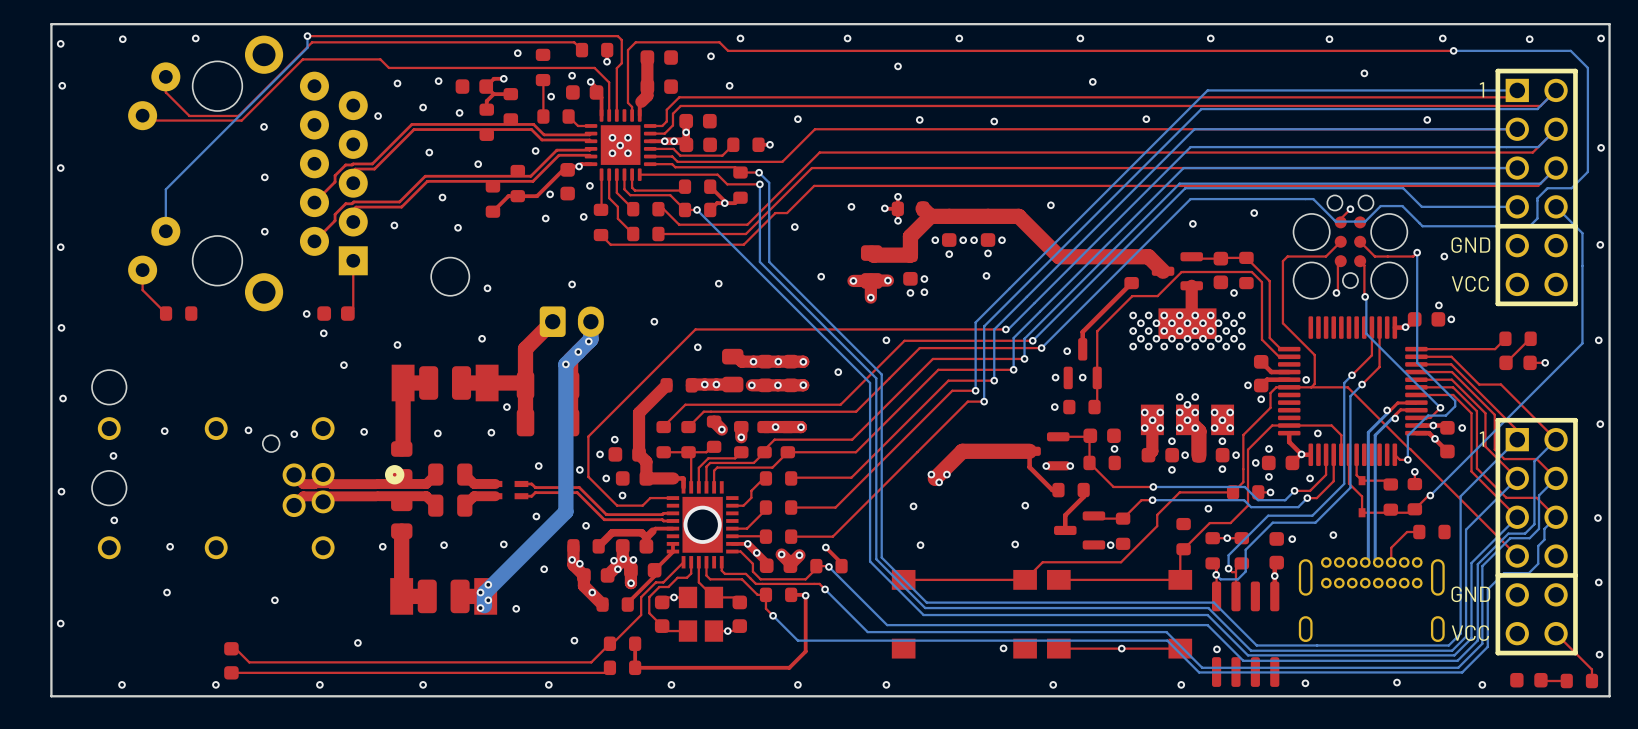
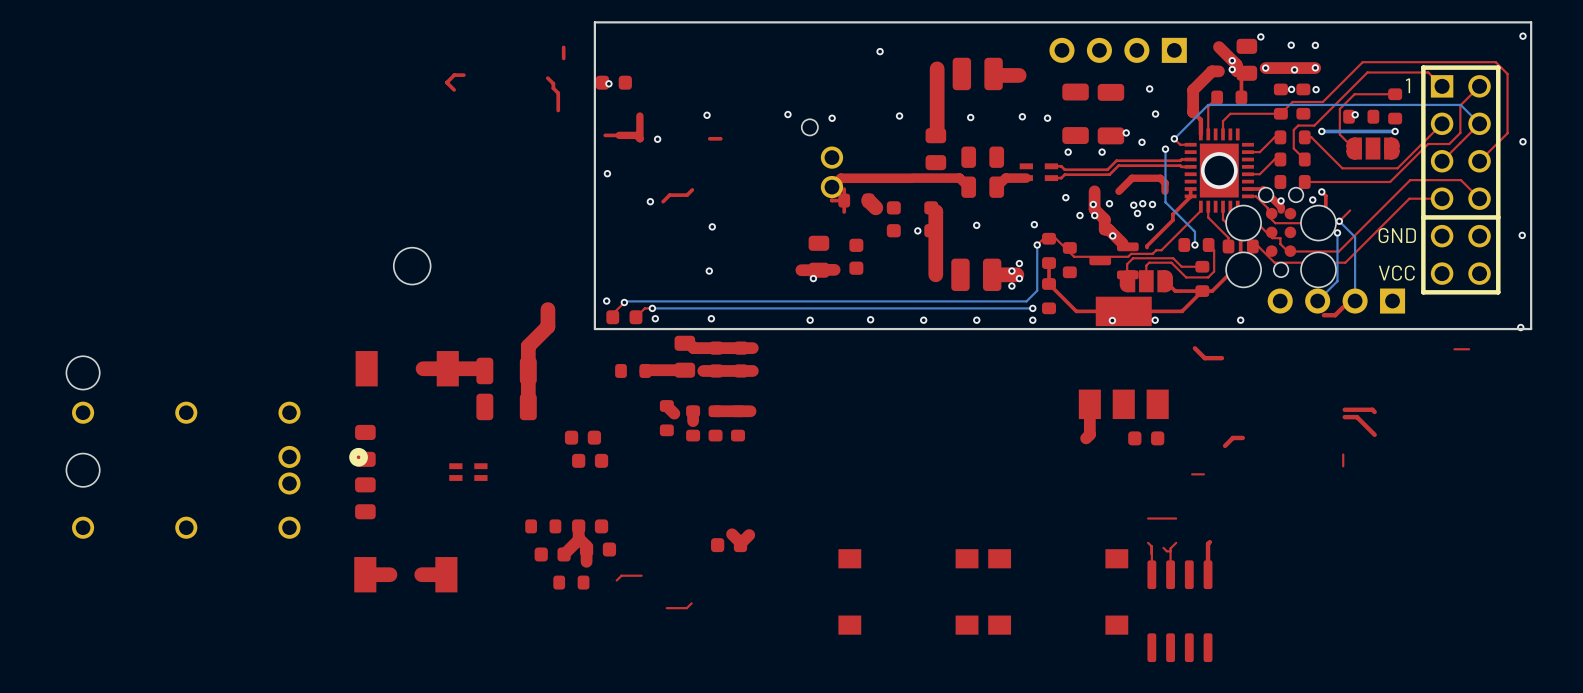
board edge: (639, 24) (51, 24) (51, 696) (1609, 696) (1609, 341) -> (594, 22) (594, 329) (1531, 329)
top track: (306, 36) (617, 36) (621, 40) (621, 63) (616, 68) (616, 115) -> none
bottom track: (307, 36) (307, 47) (165, 189) (165, 225) -> none
via: (307, 36) -> none
via: (195, 38) -> none
via: (740, 38) -> none
via: (847, 38) -> none
via: (959, 38) -> none
via: (1080, 38) -> none
via: (1210, 38) -> none
via: (1442, 38) -> none
via: (122, 39) -> none
via: (1529, 39) -> none
via: (60, 43) -> none
via: none -> (1291, 45)
via: none -> (1315, 45)
top track: none -> (1218, 47) (1236, 64) (1236, 71) (1246, 73) (1241, 78) (1241, 97)
top track: (582, 50) (574, 42) (312, 42) (238, 115) (189, 115) (165, 92) (165, 71) -> none
part: (594, 50) -> none
top track: (1453, 50) (728, 50) (719, 42) (635, 42) (627, 50) (627, 102) (632, 106) (632, 115) -> none
bottom track: (1453, 50) (1570, 50) (1587, 67) (1587, 171) (1571, 188) (1547, 188) (1537, 198) (1537, 218) (1529, 226) (1422, 226) (1402, 206) (1380, 206) (1365, 221) (1335, 221) (1313, 199) (1190, 199) (1041, 348) -> none
via: (1453, 50) -> none
via: (517, 53) -> none
part: none -> (1118, 50)
via: none -> (880, 51)
via: (711, 56) -> none
top track: (647, 57) (647, 95) (639, 103) (639, 115) -> none
part: (659, 57) -> none
via: (607, 61) -> none
part: none -> (1246, 59)
via: none -> (1232, 60)
via: (898, 66) -> none
part: (543, 67) -> none
via: none -> (1265, 68)
top track: none -> (1315, 68) (1265, 68)
via: none -> (1315, 67)
top track: none -> (937, 68) (935, 132)
via: none -> (1232, 69)
top track: none -> (1218, 71) (1211, 71) (1193, 90) (1193, 112) (1200, 119) (1200, 134)
via: (572, 75) -> none
part: none -> (977, 73)
via: (503, 78) -> none
top track: none -> (1019, 75) (994, 75)
top track: (543, 80) (543, 116) -> none
via: (438, 81) -> none
via: (590, 81) -> none
via: (1092, 81) -> none
via: (397, 83) -> none
via: (62, 85) -> none
via: (729, 85) -> none
part: (474, 86) -> none
via: none -> (608, 83)
top track: (1517, 90) (1510, 97) (679, 97) (666, 109) (666, 121) (662, 125) (650, 125) -> (1442, 86) (1428, 72) (1367, 72) (1314, 125) (1298, 125) (1293, 129) (1293, 148) (1304, 159)
bottom track: (1517, 90) (1207, 90) (975, 322) (975, 390) -> none
bottom track: (1556, 90) (1537, 109) (1201, 109) (984, 326) (984, 401) -> none
part: (584, 92) -> none
via: none -> (1149, 88)
via: none -> (1291, 89)
via: none -> (1316, 89)
top track: (510, 94) (493, 94) (486, 101) (486, 109) -> none
via: (551, 96) -> none
top track: none -> (1395, 94) (1354, 94) (1339, 108) (1339, 134) (1353, 148)
top track: none -> (1217, 97) (1208, 106) (1208, 134)
part: none -> (1229, 97)
top track: (1540, 105) (680, 105) (672, 113) (672, 125) (664, 133) (650, 133) -> (1464, 101) (1460, 105) (1460, 132) (1449, 144) (1428, 144) (1390, 181) (1304, 181)
part: (510, 106) -> none
part: none -> (1280, 101)
part: none -> (1303, 101)
via: (423, 107) -> none
part: none -> (1395, 106)
via: (459, 112) -> none
top track: (609, 115) (609, 82) (594, 67) (388, 67) (380, 59) (302, 59) (241, 120) (147, 120) (142, 115) -> none
via: (378, 116) -> none
part: (556, 116) -> none
top track: (568, 116) (578, 125) (591, 125) -> none
part: none -> (1075, 113)
via: (797, 119) -> none
via: none -> (787, 114)
via: (919, 119) -> none
via: (1146, 119) -> none
part: none -> (1110, 114)
via: none -> (1155, 114)
via: none -> (707, 115)
part: (698, 121) -> none
via: none -> (899, 116)
via: (994, 121) -> none
via: none -> (1022, 116)
part: none -> (1361, 116)
part: (486, 122) -> none
via: none -> (970, 117)
via: none -> (832, 118)
via: none -> (1047, 118)
via: (264, 126) -> none
top track: (1517, 129) (814, 129) (782, 161) (677, 161) (672, 156) (650, 156) -> (1442, 123) (1397, 168) (1342, 168) (1311, 137) (1304, 137)
bottom track: (1517, 129) (1194, 129) (994, 329) (994, 380) -> none
bottom track: (1556, 129) (1538, 147) (1190, 147) (1008, 329) (1005, 329) -> (1479, 123) (1460, 104) (1208, 104) (1174, 138)
via: (686, 132) -> none
top track: (591, 133) (544, 134) (533, 124) (411, 124) (372, 163) (345, 164) (335, 175) (335, 181) (314, 202) -> none
via: (612, 137) -> none
via: (627, 137) -> none
via: none -> (1321, 131)
bottom track: none -> (1395, 131) (1321, 131)
via: none -> (1395, 131)
via: none -> (1126, 132)
top track: (591, 141) (541, 139) (531, 129) (414, 129) (374, 169) (355, 169) (353, 171) (353, 183) -> none
via: (664, 141) -> none
via: (674, 141) -> none
top track: none -> (1280, 137) (1274, 137) (1259, 152) (1247, 152)
part: none -> (1292, 137)
part: (698, 144) -> none
top track: (733, 144) (722, 155) (680, 155) (673, 148) (650, 148) -> none
part: (745, 144) -> none
via: (769, 144) -> none
top track: none -> (1174, 138) (1180, 144) (1190, 144)
via: none -> (1174, 138)
part: (620, 145) -> none
via: (620, 145) -> none
via: none -> (657, 139)
top track: (591, 148) (556, 150) (530, 176) (425, 176) (399, 201) (353, 201) (345, 203) (335, 214) (335, 220) (314, 241) -> none
via: none -> (1141, 142)
via: (535, 150) -> none
via: (429, 152) -> none
top track: (1532, 152) (819, 152) (747, 224) (679, 224) (663, 209) (658, 209) -> (1457, 146) (1442, 161)
via: (612, 153) -> none
via: (627, 153) -> none
part: none -> (1373, 148)
part: none -> (935, 149)
bottom track: none -> (1165, 149) (1165, 202) (1194, 231) (1194, 245)
via: none -> (1165, 149)
top track: (591, 156) (559, 155) (532, 181) (427, 181) (401, 207) (355, 207) (353, 209) (353, 221) -> none
via: none -> (1068, 152)
via: none -> (1102, 152)
part: none -> (982, 157)
via: (478, 164) -> none
top track: (591, 164) (581, 164) (579, 166) (571, 166) (567, 169) (563, 169) (536, 196) (508, 196) (492, 211) -> none
top track: (650, 164) (672, 164) (675, 167) (735, 167) (740, 172) (758, 172) -> none
part: none -> (822, 158)
via: (579, 166) -> none
top track: none -> (1190, 159) (1116, 160) (1107, 169) (1064, 169) (1061, 166) (1051, 166)
top track: none -> (1280, 159) (1274, 159) (1259, 174) (1247, 174)
part: none -> (1292, 159)
via: (60, 168) -> none
top track: (1517, 168) (811, 168) (745, 234) (658, 234) -> none
bottom track: (1517, 168) (1183, 168) (1013, 337) (1013, 369) -> none
top track: (1556, 168) (1538, 185) (814, 185) (787, 213) (775, 213) (743, 244) (610, 244) (601, 235) -> (1479, 161) (1507, 133) (1507, 73) (1495, 62) (1362, 62) (1322, 101) (1292, 101) (1280, 113) (1230, 113) (1222, 121) (1222, 134)
bottom track: (1556, 168) (1540, 183) (1179, 183) (1024, 338) (1024, 358) -> none
bottom track: (759, 172) (769, 182) (769, 261) (881, 374) (881, 557) (926, 602) (1213, 602) (1256, 645) (1316, 645) -> none
via: (759, 172) -> none
part: (247, 173) -> none
top track: none -> (1190, 166) (1118, 165) (1109, 174) (1064, 174) (1061, 178) (1051, 178)
top track: (601, 174) (601, 209) -> none
top track: (609, 174) (609, 198) (617, 206) (617, 218) (633, 234) -> none
top track: (616, 174) (616, 192) (633, 209) -> none
top track: (624, 174) (624, 189) (630, 195) (670, 195) (685, 209) (697, 209) -> none
top track: (632, 174) (632, 187) (634, 190) (681, 190) (685, 186) -> none
top track: (639, 174) (717, 174) (727, 184) (759, 184) -> none
via: (264, 177) -> none
part: none -> (1219, 170)
via: none -> (1219, 170)
part: none -> (1038, 172)
via: none -> (607, 173)
part: (567, 181) -> none
part: (517, 183) -> none
bottom track: (759, 184) (759, 261) (876, 378) (876, 559) (925, 608) (1208, 608) (1251, 650) (1452, 650) (1466, 636) (1466, 529) (1517, 478) -> none
via: (759, 184) -> none
via: (589, 185) -> none
part: (740, 185) -> none
top track: none -> (911, 178) (840, 178) (831, 187)
top track: none -> (913, 178) (959, 178) (968, 187)
top track: none -> (1026, 178) (1005, 178) (996, 187)
part: (697, 186) -> none
top track: (710, 186) (726, 203) -> none
part: none -> (1292, 181)
via: (550, 194) -> none
part: none -> (982, 187)
via: (898, 196) -> none
top track: none -> (1190, 188) (1190, 196) (1172, 214) (1172, 220) (1147, 247)
top track: none -> (1247, 188) (1262, 188) (1281, 207) (1281, 210)
via: (442, 197) -> none
part: (492, 199) -> none
top track: none -> (1094, 191) (1094, 209) (1104, 219) (1104, 229) (1108, 229) (1122, 243)
top track: none -> (1165, 191) (1165, 182) (1160, 178) (1132, 178) (1118, 191)
top track: none -> (1321, 191) (1325, 195) (1325, 210)
via: none -> (1321, 191)
via: (724, 203) -> none
top track: none -> (1247, 196) (1255, 196) (1267, 208) (1267, 215) (1275, 223) (1337, 223) (1350, 210)
via: (1050, 205) -> none
via: none -> (1065, 197)
via: (851, 206) -> none
top track: none -> (1442, 198) (1409, 198) (1345, 262) (1274, 262) (1258, 246) (1252, 246)
bottom track: (1517, 206) (1421, 206) (1403, 188) (1185, 188) (1032, 340) -> none
top track: none -> (1479, 198) (1460, 180) (1410, 180) (1338, 251) (1287, 251) (1280, 244) (1280, 238) (1272, 238) (1257, 223) (1226, 223) (1222, 219) (1222, 206)
bottom track: (1556, 206) (1582, 233) (1582, 343) (1430, 495) -> none
via: (884, 208) -> none
via: none -> (1312, 199)
part: (645, 209) -> none
bottom track: (697, 209) (870, 383) (870, 561) (923, 615) (1207, 615) (1248, 655) (1454, 655) (1471, 638) (1471, 563) (1517, 517) -> none
part: (697, 209) -> none
top track: (1350, 209) (1340, 218) (1340, 222) -> none
via: none -> (1093, 204)
via: none -> (1109, 203)
via: none -> (1142, 203)
via: none -> (1152, 204)
via: none -> (1133, 205)
via: (1254, 213) -> none
top track: none -> (1200, 206) (1200, 210) (1161, 250) (1156, 250) (1152, 253) (1131, 253) (1128, 256) (1074, 256) (1056, 238) (1043, 238) (1037, 245)
top track: none -> (1208, 206) (1208, 217) (1228, 237) (1228, 246)
via: (583, 216) -> none
via: (545, 218) -> none
via: (898, 220) -> none
top track: none -> (935, 211) (935, 274)
part: (601, 222) -> none
via: none -> (1137, 213)
via: (1192, 223) -> none
via: none -> (1079, 215)
via: none -> (1094, 215)
via: (394, 225) -> none
via: (458, 227) -> none
via: (794, 227) -> none
bottom track: none -> (1339, 221) (1355, 237) (1355, 301)
via: none -> (1339, 221)
via: (264, 231) -> none
via: none -> (1034, 224)
part: (645, 234) -> none
via: none -> (976, 225)
via: none -> (712, 226)
via: none -> (1150, 226)
via: (935, 240) -> none
via: (963, 240) -> none
via: (1002, 240) -> none
top track: (1340, 241) (1325, 256) (1287, 256) (1282, 261) (1282, 323) (1314, 355) (1314, 383) (1311, 387) -> none
top track: (1360, 241) (1374, 256) (1413, 256) (1417, 252) -> none
bottom track: none -> (1337, 232) (1337, 281) (1317, 301)
via: none -> (1337, 232)
via: none -> (1112, 235)
via: (60, 247) -> none
top track: none -> (1240, 237) (1240, 262) (1212, 291) (1175, 291) (1165, 281)
bottom track: (1417, 252) (1417, 362) (1455, 400) (1455, 406) (1445, 415) (1428, 415) (1407, 435) (1407, 459) -> none
via: (1417, 252) -> none
top track: (871, 253) (873, 255) (910, 255) (910, 236) (930, 216) (1018, 216) (1059, 256) (1148, 256) (1163, 271) -> none
via: (988, 253) -> none
via: (949, 254) -> none
bottom track: none -> (1037, 245) (1037, 290) (1026, 301) (624, 302)
via: none -> (1037, 245)
via: none -> (1194, 245)
part: none -> (1196, 245)
top track: none -> (1208, 245) (1214, 250) (1214, 271) (1208, 277) (1186, 277) (1171, 262) (1149, 262) (1146, 265) (1146, 281)
top track: (1191, 256) (1193, 258) (1246, 257) (1269, 281) (1269, 337) (1280, 349) (1289, 349) -> none
part: none -> (1240, 246)
via: (1444, 256) -> none
top track: (353, 260) (353, 308) (347, 313) -> none
part: none -> (1049, 250)
top track: (1340, 261) (1337, 263) (1336, 292) -> none
top track: (1360, 261) (1364, 265) (1365, 296) -> none
top track: (142, 270) (142, 290) (166, 313) -> none
part: (1220, 270) -> none
part: (1246, 270) -> none
top track: none -> (1049, 262) (1049, 283) (1076, 311) (1182, 311) (1202, 291)
via: none -> (1019, 263)
via: (986, 275) -> none
via: (821, 276) -> none
top track: none -> (1202, 266) (1181, 266) (1173, 258) (1133, 258) (1127, 264) (1127, 281)
top track: (870, 279) (870, 297) -> none
via: (924, 279) -> none
via: (853, 280) -> none
via: (887, 280) -> none
via: none -> (709, 271)
via: none -> (1011, 271)
via: (718, 283) -> none
top track: (1131, 283) (1082, 331) (1082, 349) -> none
via: (572, 284) -> none
part: none -> (976, 274)
top track: none -> (1016, 274) (992, 274)
top track: (1191, 285) (1191, 311) (1195, 315) -> none
via: (487, 288) -> none
via: none -> (813, 278)
via: none -> (1019, 278)
part: none -> (1202, 278)
via: (910, 292) -> none
via: (924, 292) -> none
part: none -> (1146, 281)
via: (1234, 292) -> none
via: (1336, 292) -> none
bottom track: (1365, 296) (1366, 333) (1440, 407) -> none
via: (1365, 296) -> none
via: (870, 297) -> none
via: none -> (1011, 286)
via: (1438, 305) -> none
part: none -> (1049, 296)
via: none -> (606, 301)
part: none -> (1336, 301)
part: (178, 313) -> none
via: (306, 313) -> none
part: (336, 313) -> none
top track: none -> (624, 302) (612, 314) (612, 317)
via: none -> (624, 302)
via: (1133, 315) -> none
via: (1148, 315) -> none
via: (1164, 315) -> none
via: (1179, 315) -> none
via: (1195, 315) -> none
via: (1210, 315) -> none
via: (1226, 315) -> none
via: (1241, 315) -> none
part: (1426, 319) -> none
via: (1451, 319) -> none
top track: none -> (652, 308) (644, 308) (635, 317)
via: none -> (652, 308)
bottom track: none -> (1032, 308) (652, 308)
via: none -> (1032, 308)
top track: (552, 321) (525, 348) (525, 422) -> none
part: (571, 321) -> none
bottom track: (590, 321) (590, 339) (565, 364) (565, 511) (484, 593) (484, 605) -> none
via: (654, 321) -> none
via: (1140, 323) -> none
via: (1156, 323) -> none
via: (1171, 323) -> none
via: (1187, 323) -> none
via: (1202, 323) -> none
via: (1218, 323) -> none
via: (1234, 323) -> none
via: (61, 327) -> none
top track: (1371, 327) (1371, 355) (1351, 375) -> none
top track: (1379, 327) (1379, 367) (1362, 384) -> none
via: (1405, 327) -> none
part: none -> (624, 317)
top track: (1005, 329) (695, 329) (588, 436) (588, 476) (617, 505) (642, 505) (650, 498) (672, 498) -> none
via: (1005, 329) -> none
via: none -> (655, 318)
via: none -> (711, 318)
via: (1133, 331) -> none
via: (1148, 331) -> none
via: (1164, 331) -> none
via: (1179, 331) -> none
via: (1195, 331) -> none
via: (1210, 331) -> none
via: (1226, 331) -> none
via: (1241, 331) -> none
via: none -> (810, 320)
via: none -> (870, 319)
via: none -> (923, 320)
via: none -> (976, 320)
via: none -> (1032, 320)
via: none -> (1155, 320)
via: none -> (1240, 320)
via: (323, 333) -> none
via: none -> (1112, 320)
via: (482, 338) -> none
via: (1140, 338) -> none
via: (1156, 338) -> none
via: (1171, 338) -> none
via: (1187, 338) -> none
via: (1202, 338) -> none
via: (1218, 338) -> none
via: (1234, 338) -> none
top track: (1505, 338) (1495, 349) (1416, 349) -> none
part: (1518, 338) -> none
top track: (1530, 338) (1506, 362) -> none
via: (886, 340) -> none
top track: (1032, 340) (904, 340) (840, 404) (685, 404) (663, 427) -> none
via: (1032, 340) -> none
via: (588, 341) -> none
via: (397, 344) -> none
via: (1133, 346) -> none
via: (1148, 346) -> none
via: (1164, 346) -> none
via: (1179, 346) -> none
via: (1195, 346) -> none
via: (1210, 346) -> none
via: (1226, 346) -> none
via: (1241, 346) -> none
via: (697, 347) -> none
top track: (1041, 348) (919, 348) (856, 411) (703, 411) (688, 427) -> none
via: (1041, 348) -> none
via: (578, 351) -> none
via: (1067, 351) -> none
top track: (1289, 356) (1279, 356) (1261, 339) (1261, 282) (1251, 272) (1181, 272) (1157, 296) (1132, 296) (1097, 331) (1097, 404) (1094, 407) -> none
top track: (1416, 356) (1451, 356) (1479, 384) (1500, 384) (1556, 439) -> none
top track: (1024, 358) (932, 358) (852, 439) (774, 439) (753, 462) (710, 462) (706, 466) (706, 487) -> none
via: (1024, 358) -> none
via: (753, 361) -> none
via: (778, 361) -> none
via: (803, 361) -> none
part: (1518, 362) -> none
via: (1545, 362) -> none
part: (1082, 363) -> none
via: (565, 364) -> none
top track: (1416, 364) (1451, 364) (1517, 430) (1517, 439) -> none
via: (343, 365) -> none
top track: (1013, 369) (938, 369) (855, 452) (787, 452) (772, 467) (717, 467) (714, 470) (714, 487) -> none
via: (1013, 369) -> none
via: (838, 372) -> none
top track: (1416, 372) (1452, 372) (1494, 414) (1494, 449) (1504, 459) (1536, 459) (1556, 478) -> none
part: (1261, 373) -> none
bottom track: (1351, 375) (1344, 383) (1344, 483) (1312, 515) (1268, 515) (1228, 555) (1228, 568) -> none
via: (1351, 375) -> none
via: (1055, 377) -> none
via: (1082, 377) -> none
top track: (1289, 379) (1267, 379) (1261, 385) -> none
via: (1306, 379) -> none
top track: (1416, 379) (1451, 379) (1485, 413) (1485, 446) (1517, 478) -> none
top track: (994, 380) (948, 380) (851, 477) (791, 478) -> none
via: (994, 380) -> none
top track: (428, 383) (403, 383) (401, 448) -> none
part: (445, 383) -> none
via: (704, 384) -> none
via: (716, 384) -> none
bottom track: (1362, 384) (1350, 396) (1350, 487) (1315, 522) (1272, 522) (1245, 549) (1245, 571) (1237, 579) (1220, 579) (1216, 574) -> none
via: (1362, 384) -> none
top track: (666, 385) (639, 412) (639, 454) (646, 461) (646, 478) (683, 478) (683, 487) -> none
via: (751, 385) -> none
via: (777, 385) -> none
via: (803, 385) -> none
via: (1248, 385) -> none
top track: (1416, 387) (1453, 387) (1476, 411) (1476, 468) (1506, 497) (1536, 497) (1556, 517) -> none
top track: (975, 390) (952, 390) (835, 507) (791, 507) -> none
via: (975, 390) -> none
part: (1352, 391) -> none
top track: (1416, 394) (1453, 394) (1471, 413) (1471, 471) (1517, 517) -> none
via: (1179, 396) -> none
via: (1195, 396) -> none
via: (63, 398) -> none
via: (1261, 399) -> none
top track: (984, 401) (967, 401) (832, 536) (791, 536) -> none
via: (984, 401) -> none
top track: (1416, 402) (1397, 402) (1390, 410) (1387, 410) -> none
via: (1187, 404) -> none
via: (506, 407) -> none
via: (1054, 407) -> none
part: (1081, 407) -> none
top track: (1440, 407) (1430, 417) (1416, 417) -> none
via: (1440, 407) -> none
bottom track: (1387, 410) (1387, 413) (1368, 432) (1368, 559) (1365, 562) -> none
via: (1387, 410) -> none
top track: (1416, 410) (1400, 409) (1395, 415) (1395, 418) -> none
via: (1144, 412) -> none
via: (1160, 412) -> none
via: (1179, 412) -> none
via: (1195, 412) -> none
via: (1214, 412) -> none
via: (1230, 412) -> none
bottom track: (1395, 418) (1391, 418) (1375, 435) (1375, 559) (1378, 562) -> none
via: (1395, 418) -> none
top track: (1187, 419) (1198, 431) (1198, 455) -> none
via: (1152, 420) -> none
via: (1187, 420) -> none
via: (1222, 420) -> none
via: (1600, 424) -> none
via: (1433, 425) -> none
via: (775, 427) -> none
via: (801, 427) -> none
via: (1144, 428) -> none
via: (1160, 428) -> none
via: (1179, 428) -> none
via: (1195, 428) -> none
via: (1214, 428) -> none
via: (1230, 428) -> none
via: (1462, 428) -> none
via: (721, 429) -> none
via: (248, 430) -> none
via: (164, 431) -> none
via: (364, 431) -> none
via: (491, 432) -> none
via: (437, 433) -> none
top track: (1289, 433) (1289, 442) (1301, 454) -> none
via: (1317, 433) -> none
via: (294, 434) -> none
top track: (1090, 435) (1058, 436) -> none
part: (1102, 435) -> none
top track: (1089, 436) (1089, 462) (1113, 486) (1153, 486) -> none
via: (741, 437) -> none
via: (1435, 438) -> none
via: (614, 439) -> none
part: (663, 439) -> none
part: (688, 439) -> none
part: (1447, 439) -> none
bottom track: (1517, 439) (1460, 496) (1460, 633) (1448, 645) (1317, 645) -> none
bottom track: (1556, 439) (1534, 461) (1534, 524) (1525, 533) (1508, 533) (1477, 564) (1477, 640) (1457, 660) (1243, 660) (1207, 625) (887, 625) (828, 566) -> none
via: (1171, 441) -> none
via: (1222, 441) -> none
top track: (714, 444) (706, 452) (663, 452) -> none
via: (1114, 448) -> none
via: (1268, 448) -> none
part: (1043, 451) -> none
top track: (741, 452) (735, 458) (708, 458) (698, 467) (698, 487) -> none
top track: (691, 453) (691, 487) -> none
via: (600, 454) -> none
via: (1301, 454) -> none
top track: (1326, 454) (1326, 474) (1310, 490) (1294, 490) -> none
top track: (1333, 454) (1333, 481) (1316, 498) (1307, 498) -> none
top track: (1341, 454) (1341, 435) (1331, 425) (1272, 425) (1248, 449) (1248, 505) (1230, 523) (1209, 523) (1180, 552) (1180, 579) (1058, 579) -> none
top track: (1348, 454) (1348, 483) (1362, 496) (1362, 512) (1411, 512) (1430, 495) -> none
top track: (1356, 454) (1356, 475) (1362, 480) (1386, 480) (1390, 484) -> none
top track: (1394, 454) (1399, 459) (1407, 459) -> none
via: (113, 455) -> none
part: (1160, 455) -> none
via: (1185, 455) -> none
via: (1236, 455) -> none
via: (1407, 459) -> none
part: (1102, 462) -> none
via: (1255, 462) -> none
part: (1280, 462) -> none
via: (538, 466) -> none
via: (1046, 466) -> none
via: (1070, 466) -> none
via: (579, 469) -> none
via: (1171, 469) -> none
via: (1222, 469) -> none
via: (1414, 471) -> none
top track: (294, 474) (303, 484) (376, 484) -> none
top track: (435, 474) (426, 483) (378, 483) -> none
part: (450, 474) -> none
top track: (464, 474) (474, 483) (495, 483) -> none
via: (931, 474) -> none
via: (946, 474) -> none
part: (284, 476) -> none
via: (1268, 476) -> none
via: (606, 478) -> none
top track: (765, 478) (751, 490) (751, 497) (743, 505) (732, 505) -> none
part: (778, 478) -> none
top track: (935, 478) (962, 451) (1029, 451) (1029, 467) (1052, 490) (1058, 490) -> none
via: (1310, 478) -> none
bottom track: (1556, 478) (1539, 495) (1539, 528) (1529, 538) (1510, 538) (1482, 566) (1482, 643) (1458, 667) (1202, 667) (1166, 632) (867, 632) (825, 589) -> none
via: (939, 482) -> none
top track: (521, 483) (531, 483) (535, 487) (579, 487) (606, 514) (672, 513) -> none
bottom track: (1153, 486) (1244, 486) (1258, 500) (1285, 500) (1294, 490) -> none
via: (1153, 486) -> none
part: (1071, 490) -> none
top track: (1083, 490) (1083, 496) (1065, 515) (1065, 530) -> none
via: (1294, 490) -> none
via: (61, 491) -> none
part: (1245, 492) -> none
via: (1270, 492) -> none
via: (622, 495) -> none
via: (1430, 495) -> none
top track: (376, 496) (303, 496) (294, 505) -> none
top track: (378, 496) (426, 496) (435, 505) -> none
top track: (495, 496) (474, 496) (464, 505) -> none
top track: (521, 496) (531, 496) (535, 492) (577, 492) (604, 519) (672, 520) -> none
part: (1362, 496) -> none
part: (1414, 496) -> none
part: (1390, 497) -> none
bottom track: (1307, 498) (1298, 507) (1251, 507) (1244, 500) (1152, 500) -> none
via: (1307, 498) -> none
top track: (1152, 500) (1141, 500) (1123, 518) (1096, 518) (1093, 515) -> none
via: (1152, 500) -> none
part: (450, 505) -> none
via: (1025, 505) -> none
via: (913, 506) -> none
top track: (765, 507) (746, 528) (732, 528) -> none
part: (778, 507) -> none
via: (1208, 508) -> none
via: (536, 516) -> none
bottom track: (1556, 517) (1544, 528) (1544, 539) (1538, 545) (1538, 563) (1528, 573) (1504, 573) (1487, 589) (1487, 646) (1462, 672) (1199, 672) (1167, 640) (797, 640) (773, 615) -> none
via: (1597, 518) -> none
via: (114, 520) -> none
part: (702, 524) -> none
via: (702, 524) -> none
via: (586, 525) -> none
top track: (672, 528) (655, 528) (646, 537) -> none
part: (1079, 530) -> none
top track: (401, 531) (401, 596) -> none
part: (1123, 531) -> none
top track: (1419, 532) (1407, 532) (1391, 547) (1391, 562) -> none
part: (1431, 532) -> none
via: (1333, 535) -> none
top track: (732, 536) (765, 536) -> none
part: (778, 536) -> none
part: (1183, 536) -> none
part: (1536, 536) -> none
top track: (646, 537) (641, 532) (612, 532) (598, 546) -> none
via: (1227, 538) -> none
via: (1292, 539) -> none
top track: (672, 543) (672, 551) (654, 570) (654, 576) (627, 604) -> none
top track: (732, 543) (747, 543) (766, 562) (766, 565) -> none
via: (747, 543) -> none
via: (503, 544) -> none
via: (1015, 544) -> none
via: (444, 545) -> none
via: (920, 545) -> none
via: (1110, 545) -> none
via: (170, 546) -> none
via: (382, 546) -> none
top track: (573, 546) (573, 564) (583, 575) (583, 585) (602, 604) -> none
top track: (825, 547) (841, 563) (841, 566) -> none
via: (825, 547) -> none
part: (1212, 550) -> none
part: (1241, 550) -> none
part: (1276, 550) -> none
top track: (732, 551) (740, 551) (752, 563) (752, 571) (760, 579) (805, 579) (816, 568) (816, 566) (828, 566) -> none
via: (756, 552) -> none
via: (781, 554) -> none
via: (799, 555) -> none
top track: (1517, 556) (1347, 387) (1276, 387) (1270, 393) (1270, 407) (1243, 435) (1243, 482) (1233, 492) (1179, 492) (1157, 514) (1157, 526) (1121, 562) (1042, 562) (1025, 579) (903, 579) -> none
via: (572, 559) -> none
via: (623, 559) -> none
via: (633, 559) -> none
via: (614, 560) -> none
top track: (683, 562) (663, 582) (655, 582) (641, 597) (641, 615) (591, 662) (249, 662) (235, 648) (231, 648) -> none
top track: (691, 562) (691, 573) (686, 577) (677, 577) (668, 587) (659, 587) (649, 597) (649, 613) (667, 631) (687, 631) -> none
top track: (698, 562) (698, 582) (713, 597) (734, 597) (739, 602) -> none
top track: (706, 562) (706, 575) (710, 579) (742, 579) (757, 594) (765, 594) (765, 608) (773, 615) -> none
top track: (721, 562) (721, 570) (724, 573) (745, 573) (755, 583) (819, 583) (825, 589) -> none
via: (579, 563) -> none
part: (828, 566) -> none
via: (828, 566) -> none
via: (1228, 568) -> none
via: (544, 569) -> none
via: (617, 569) -> none
via: (1216, 574) -> none
via: (1274, 576) -> none
via: (1598, 582) -> none
via: (631, 583) -> none
via: (488, 584) -> none
via: (825, 589) -> none
via: (167, 592) -> none
via: (480, 592) -> none
via: (592, 592) -> none
part: (778, 594) -> none
top track: (791, 594) (805, 595) (805, 651) (789, 667) (635, 667) (635, 643) -> none
via: (805, 595) -> none
part: (443, 596) -> none
via: (674, 597) -> none
part: (1371, 599) -> none
via: (274, 600) -> none
via: (488, 600) -> none
via: (480, 608) -> none
via: (516, 608) -> none
part: (662, 614) -> none
part: (700, 614) -> none
part: (739, 614) -> none
via: (773, 615) -> none
via: (60, 623) -> none
via: (727, 631) -> none
top track: (1556, 633) (1591, 669) (1591, 680) -> none
via: (574, 640) -> none
via: (357, 642) -> none
part: (622, 643) -> none
via: (1003, 648) -> none
via: (1121, 648) -> none
top track: (1180, 648) (1058, 648) -> none
via: (1216, 649) -> none
via: (1599, 654) -> none
part: (231, 660) -> none
top track: (609, 667) (604, 672) (231, 672) -> none
part: (622, 667) -> none
part: (1528, 680) -> none
top track: (1540, 680) (1566, 680) -> none
part: (1579, 680) -> none
via: (1397, 682) -> none
via: (1305, 683) -> none
via: (122, 684) -> none
via: (215, 684) -> none
via: (319, 684) -> none
via: (423, 684) -> none
via: (548, 684) -> none
via: (671, 684) -> none
via: (797, 684) -> none
via: (886, 684) -> none
via: (1053, 684) -> none
via: (1181, 684) -> none
via: (1482, 684) -> none

